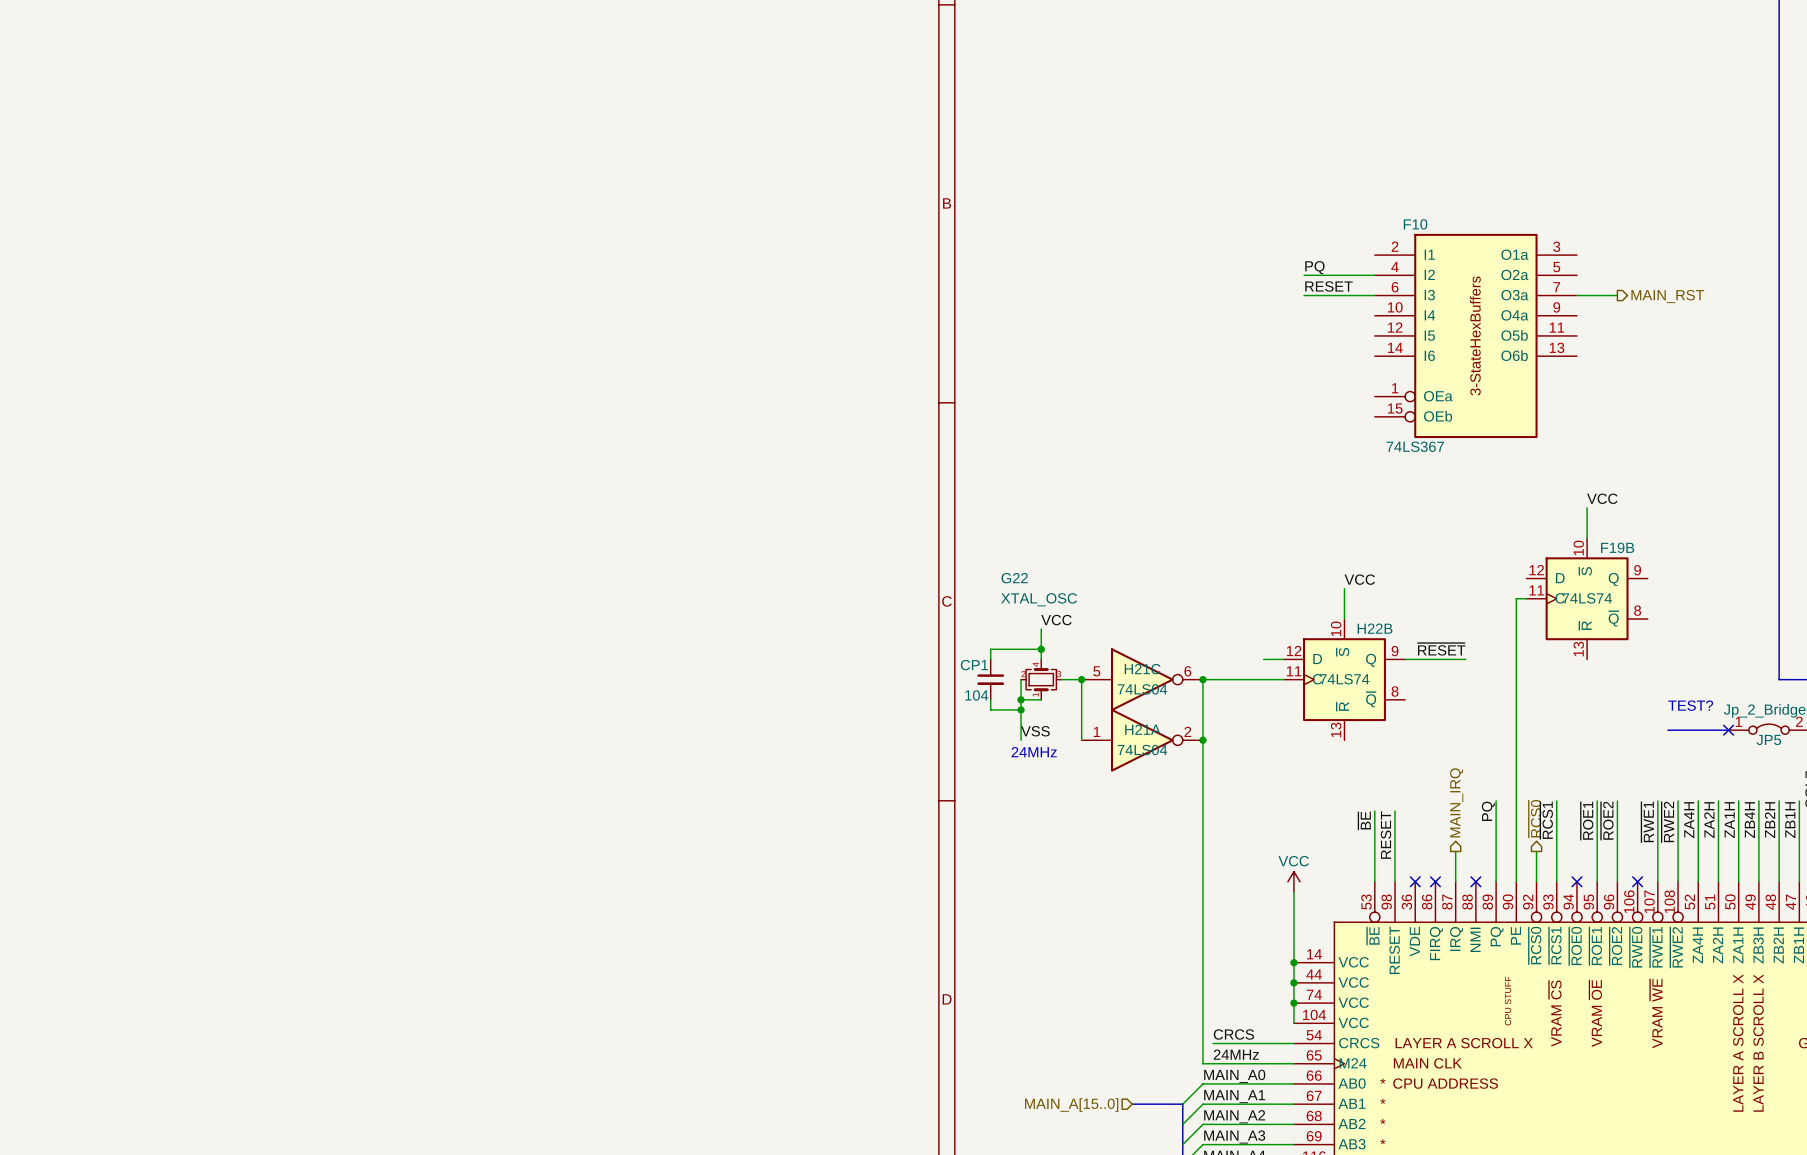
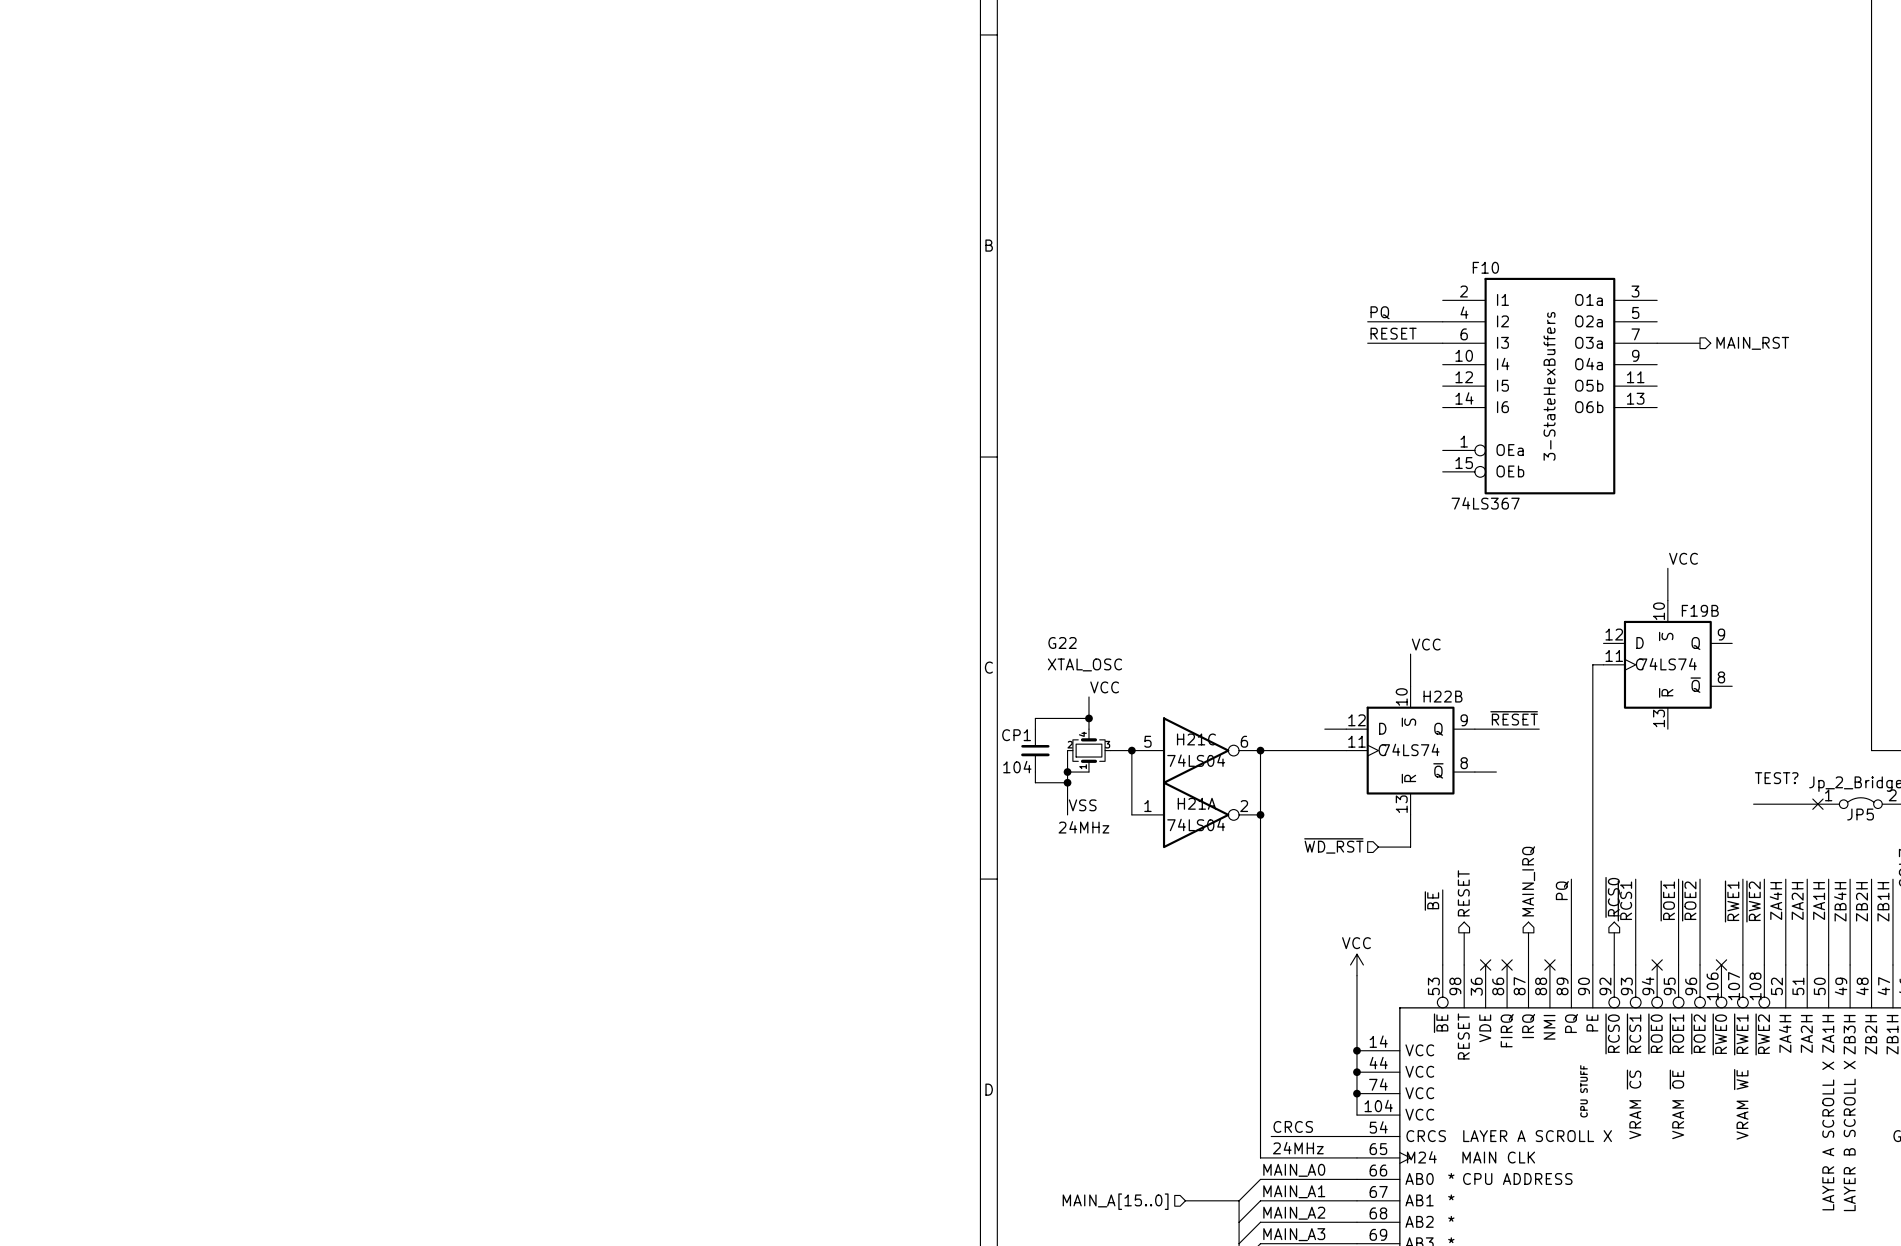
wire: none -> (1474, 772) (1496, 772)
wire: none -> (1410, 814) (1410, 847) (1378, 847)
hierarchical label: none -> ~{WD_RST} (1333, 845)
wire: (1395, 811) (1395, 851) -> none
hierarchical label: none -> RESET (1463, 893)
label: RESET (1386, 835) -> none

